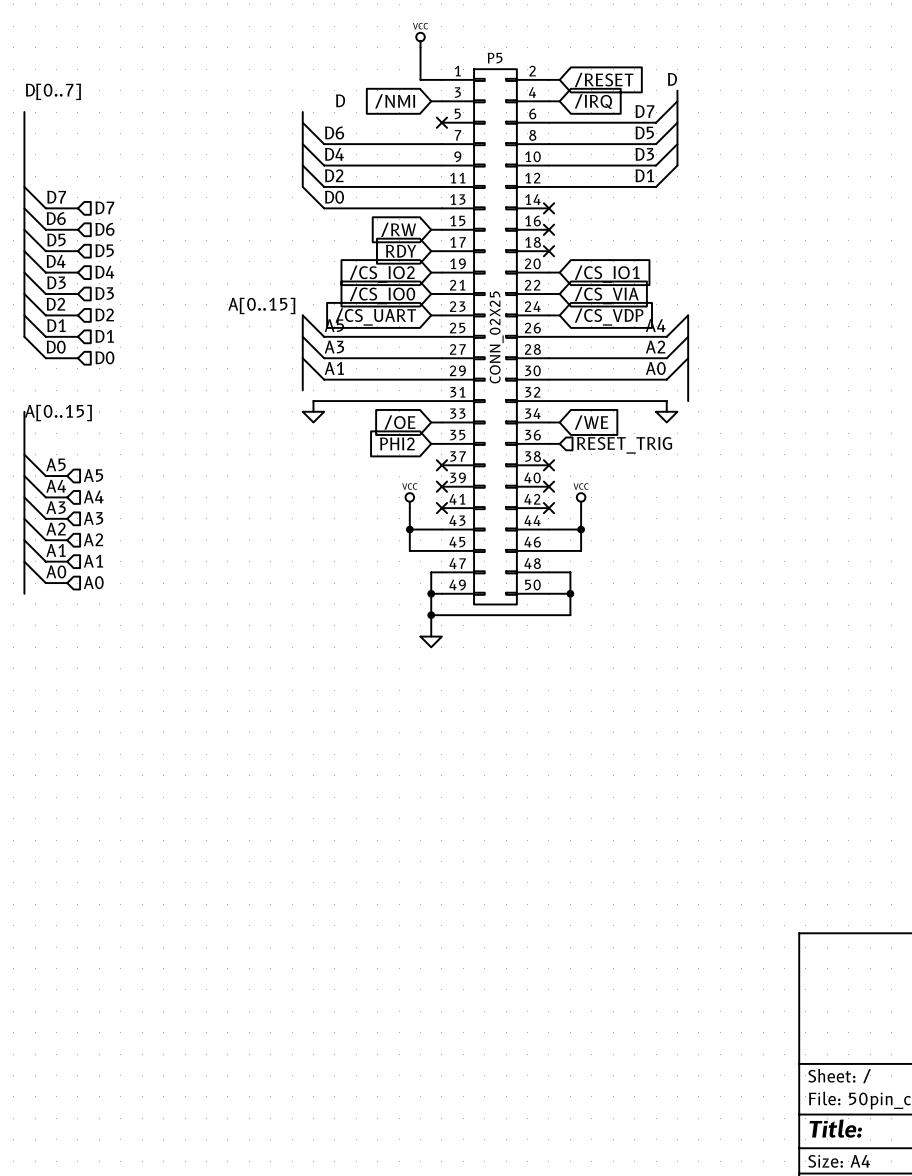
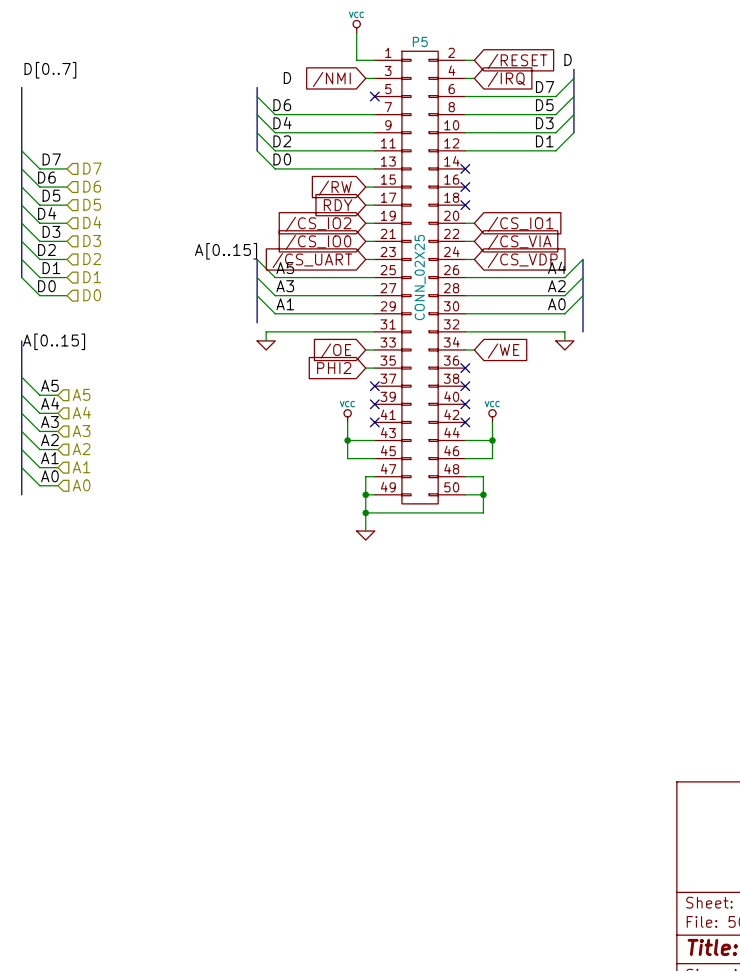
wire: (548, 443) (559, 443) -> none
no-connect mark: none -> (465, 368)
hierarchical label: RESET_TRIG (624, 445) -> none

